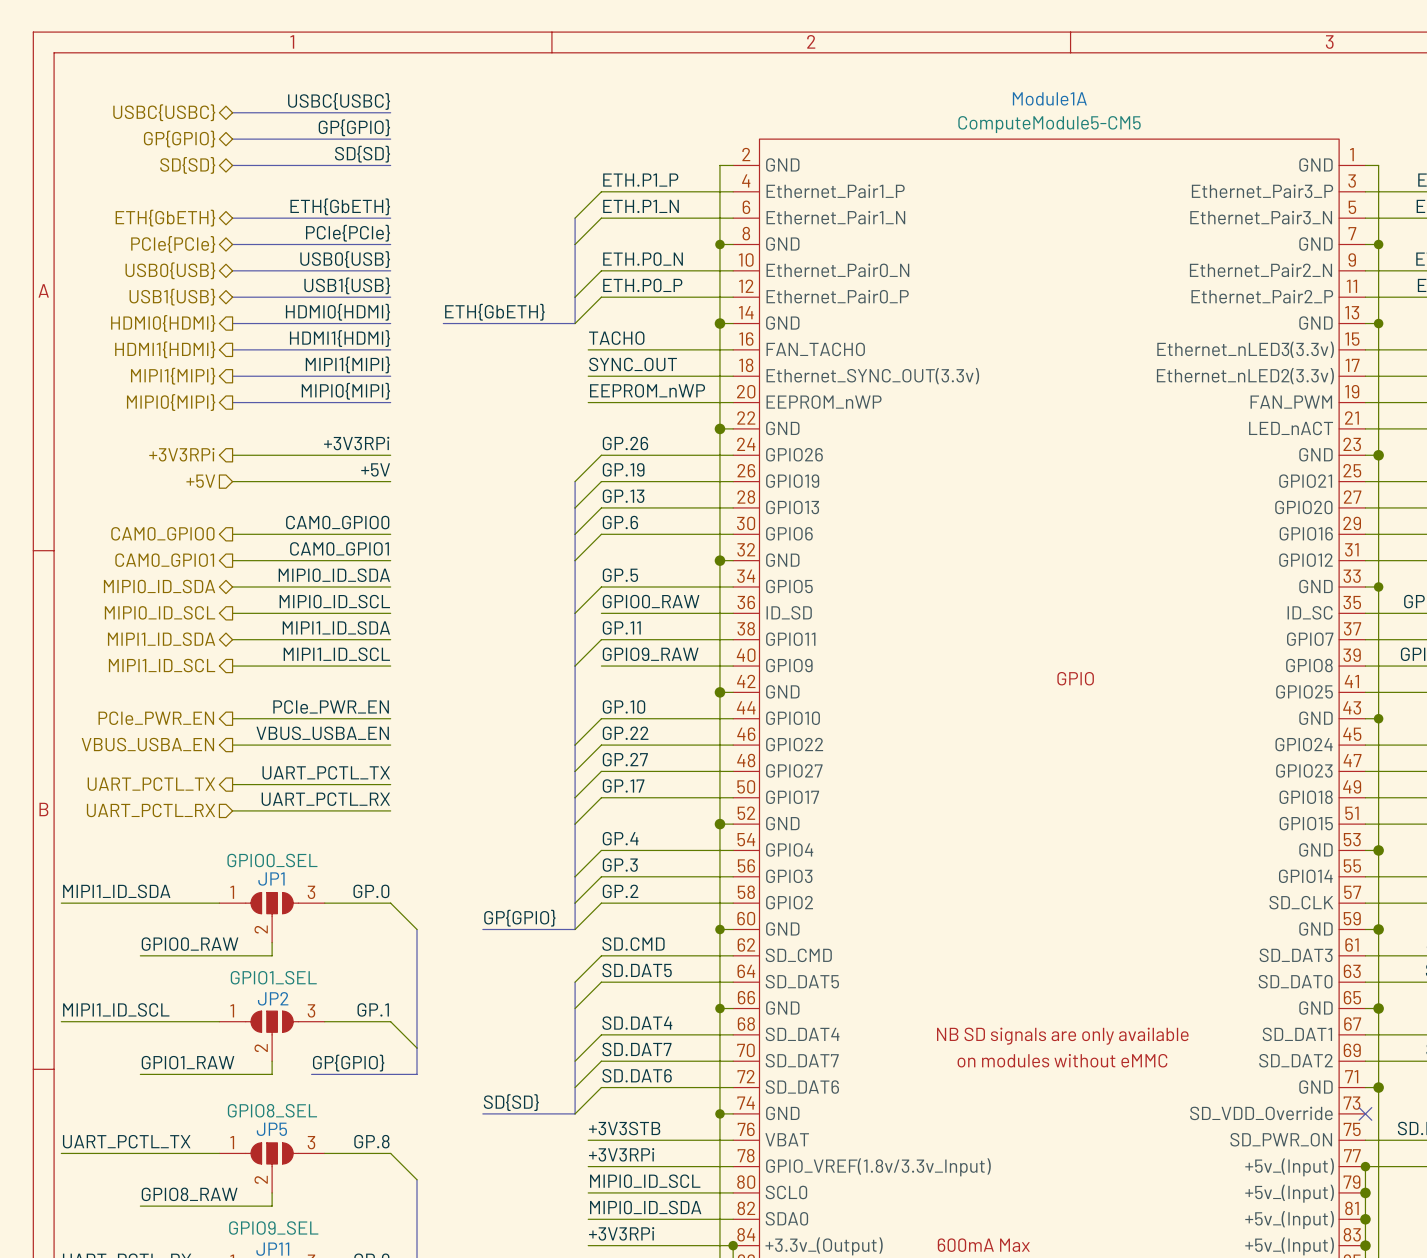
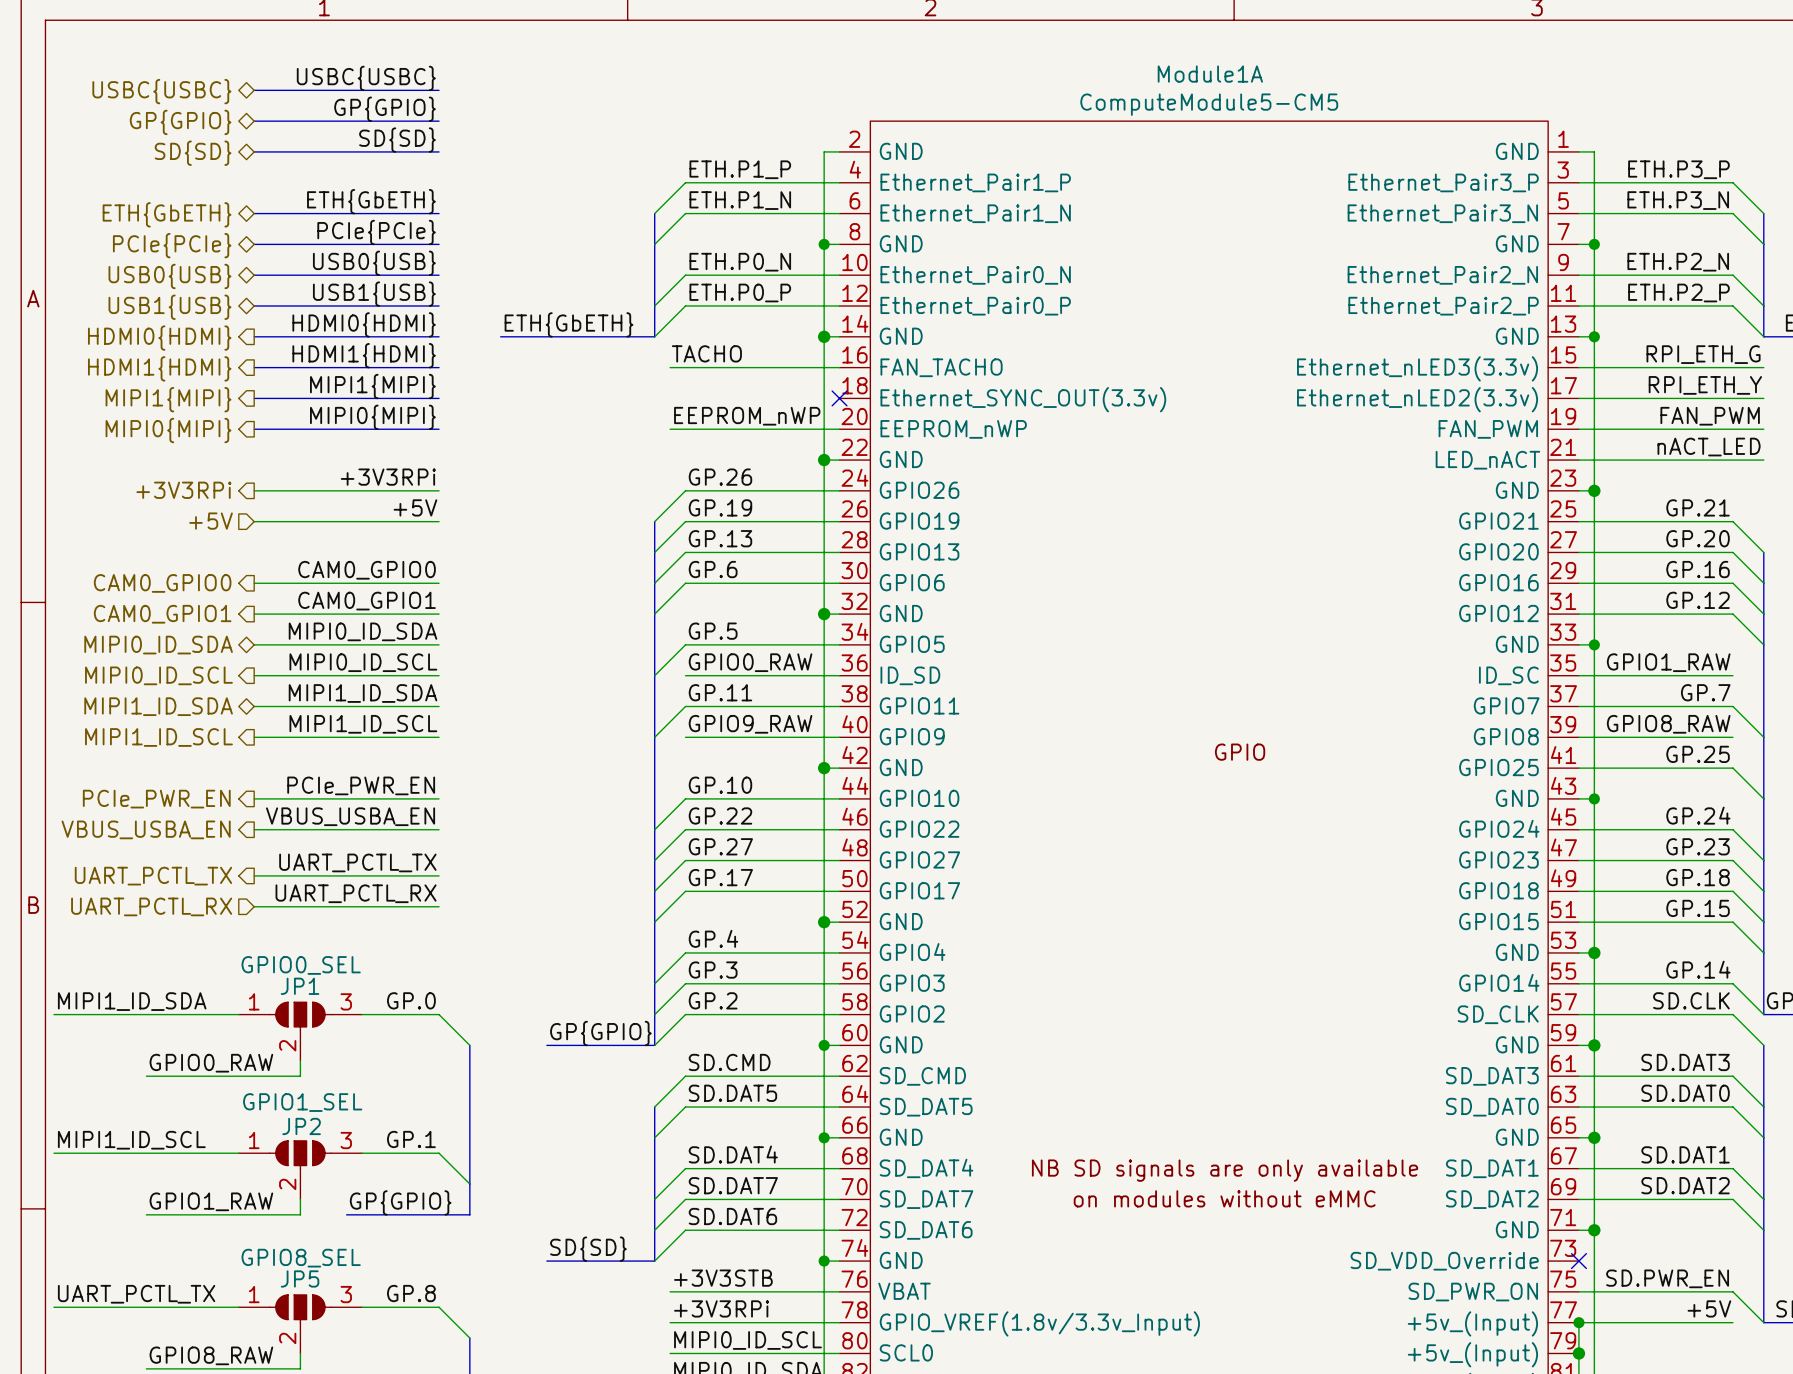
label: SYNC_OUT (633, 364) -> none
wire: (588, 376) (733, 376) -> none
no-connect mark: none -> (839, 398)

